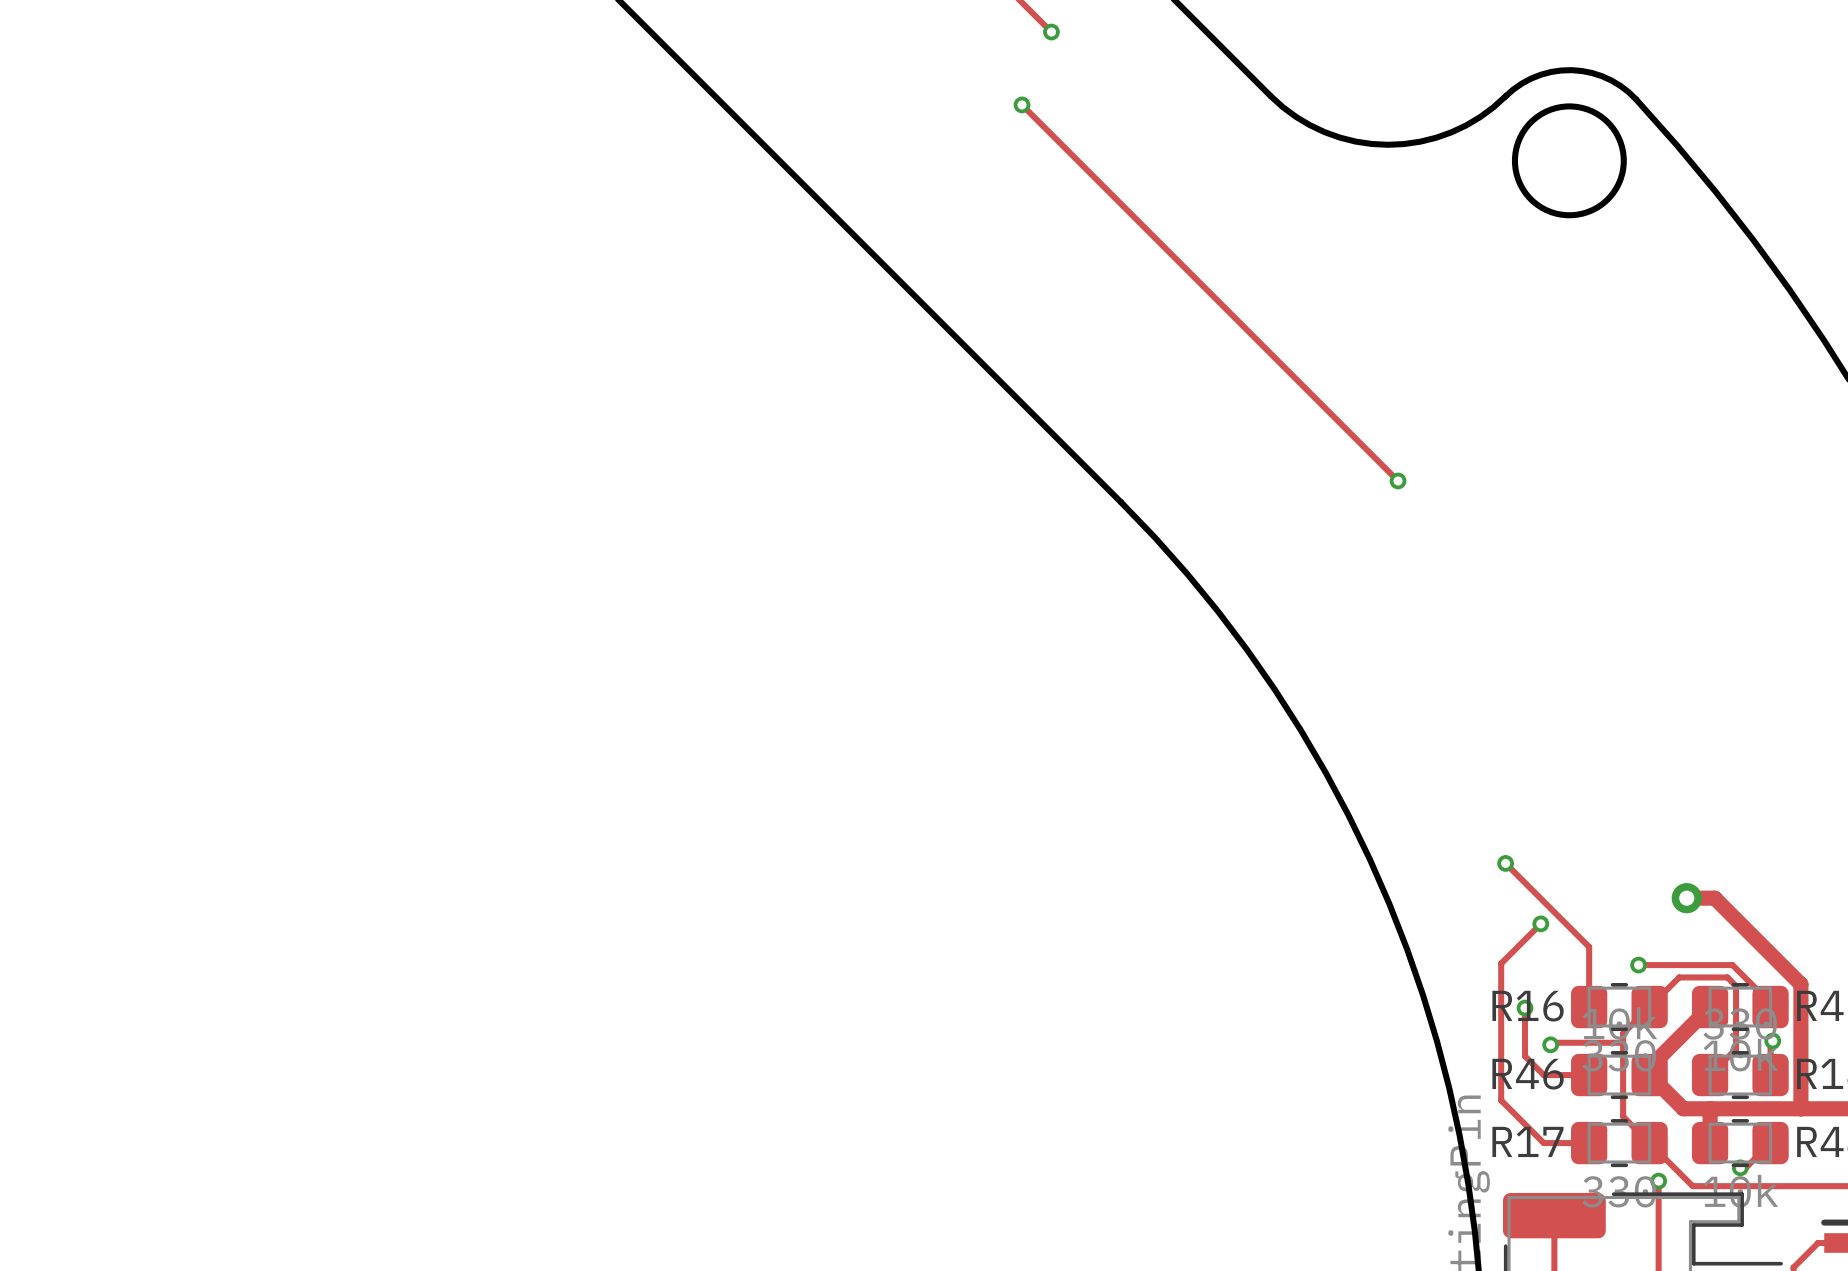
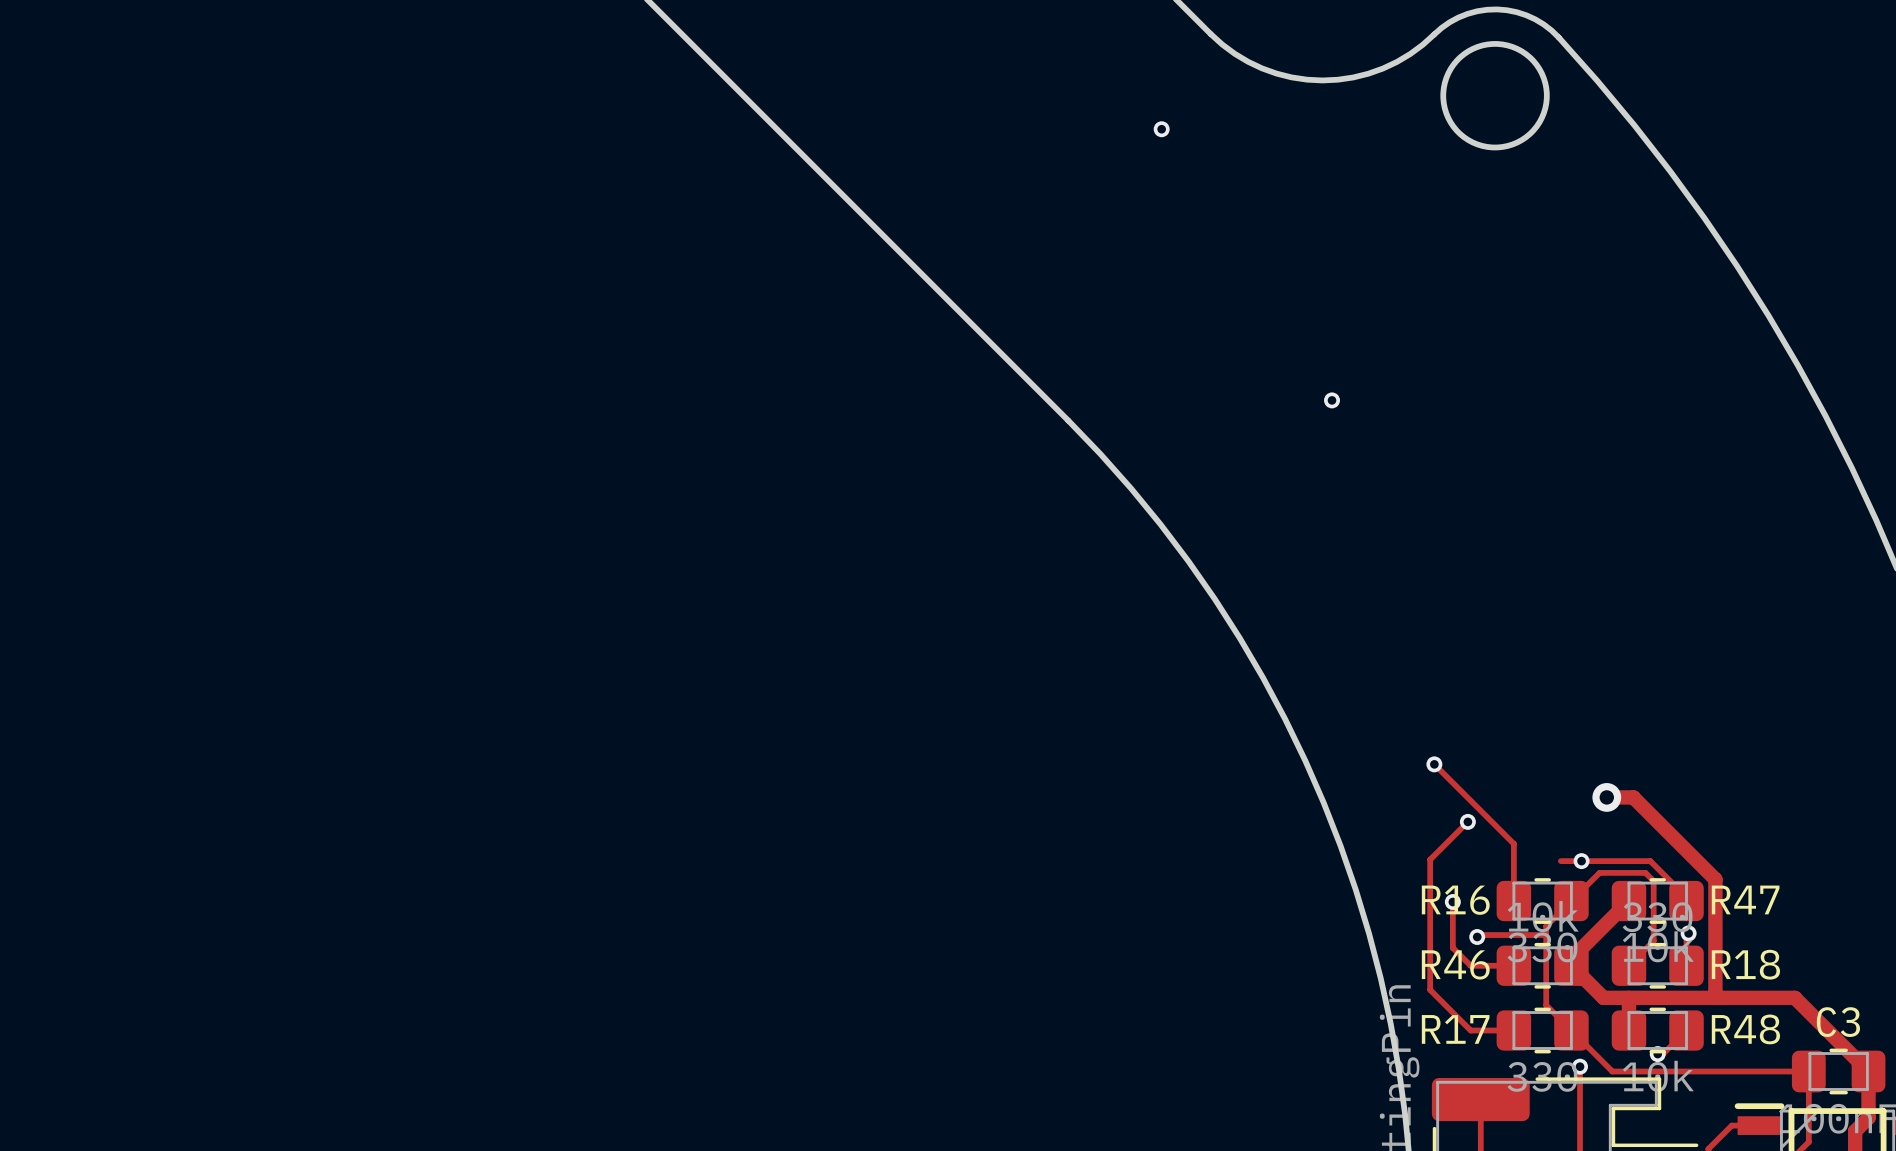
track: (1022, 104) (1398, 480) -> none
via: (1022, 104) -> none
via: none -> (1161, 129)
via position: (1638, 965) -> (1581, 861)

